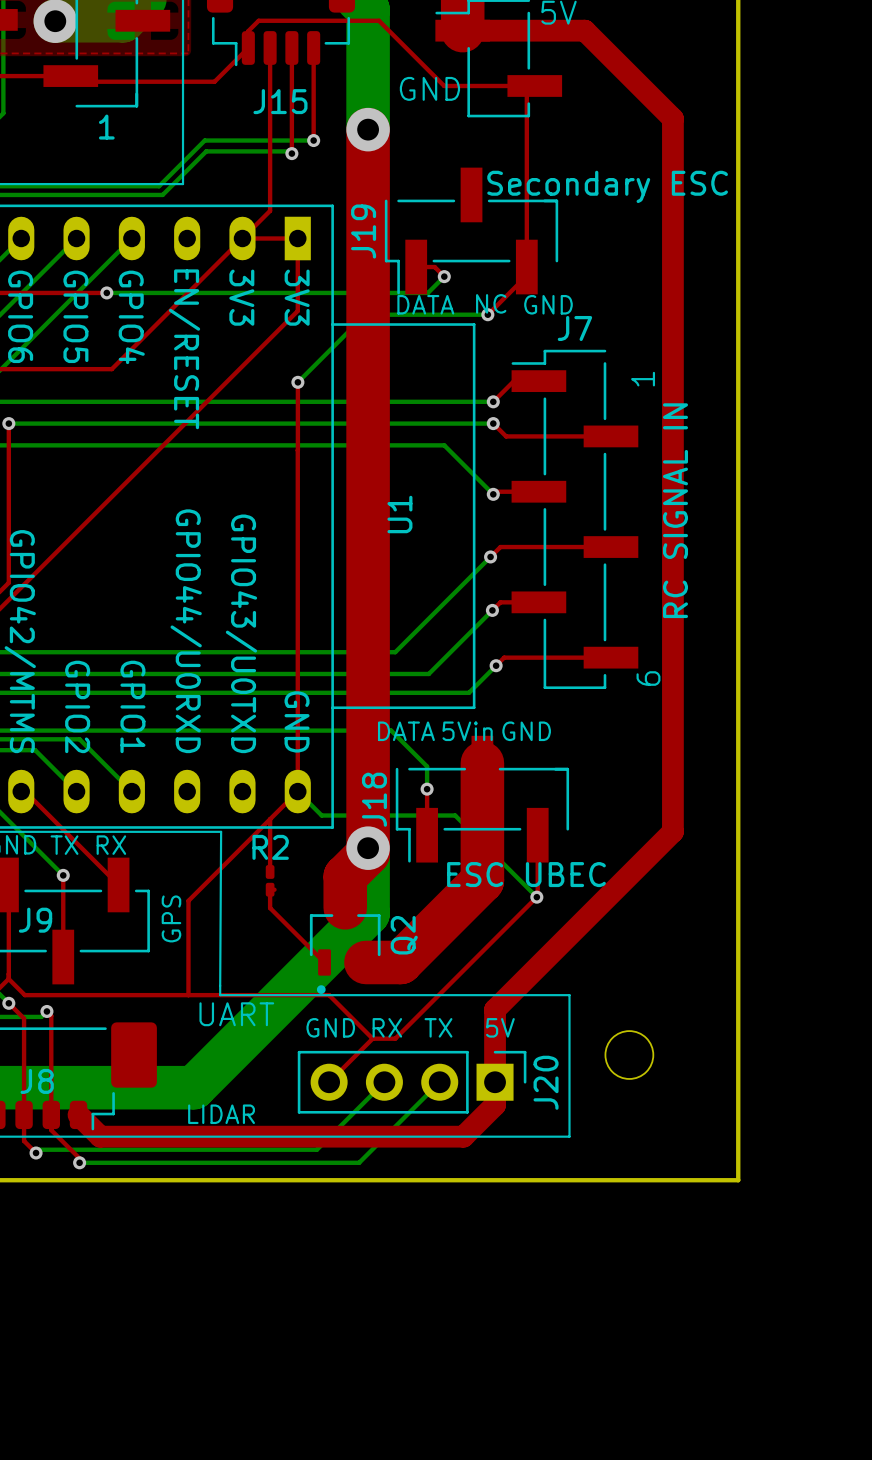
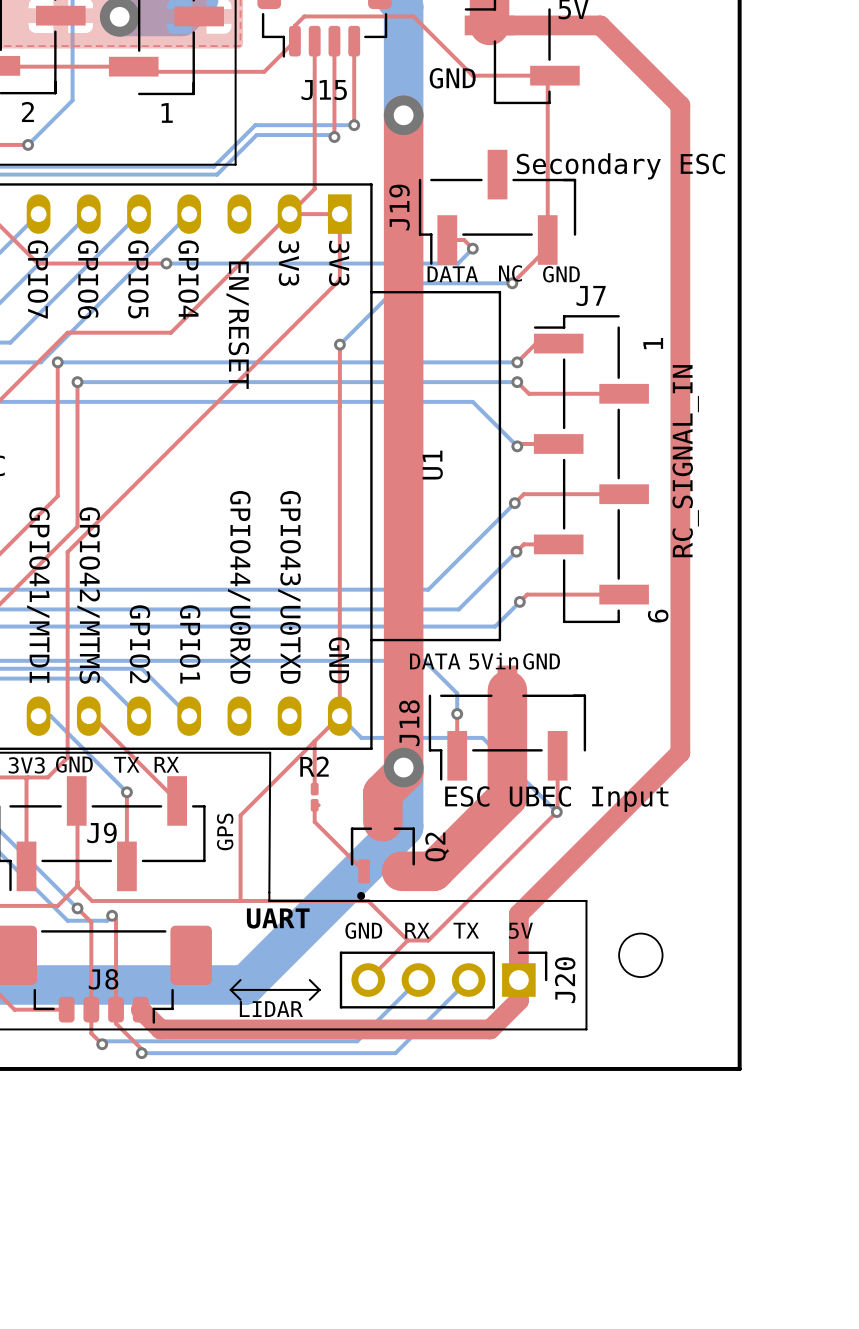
J7 value: RC SIGNAL IN (675, 510) -> RC_SIGNAL_IN (685, 461)
J18 value: ESC UBEC (526, 874) -> ESC UBEC Input (556, 799)
line: none -> (240, 980) (230, 989)
line: none -> (309, 980) (319, 989)
line: none -> (230, 989) (240, 999)
line: none -> (230, 989) (319, 989)
line: none -> (319, 989) (309, 999)

